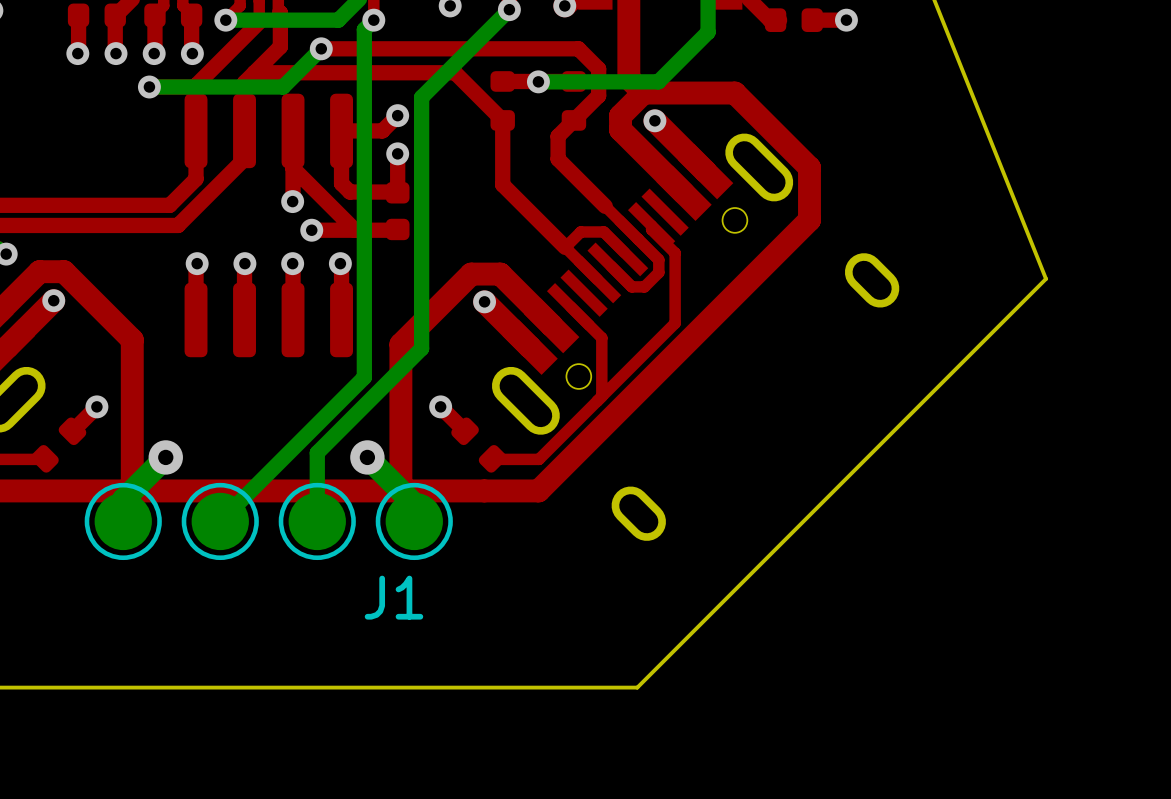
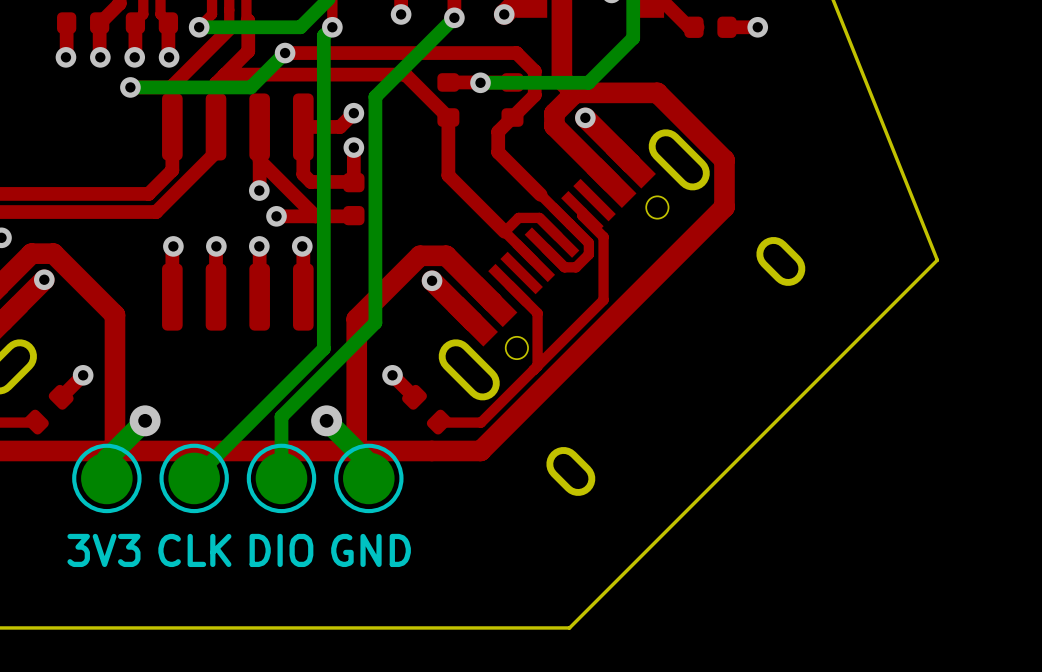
J1 name: J1 (393, 597) -> none
text: none -> 3V3 (103, 550)
text: none -> CLK (194, 550)
text: none -> DIO (281, 550)
text: none -> GND (371, 550)

